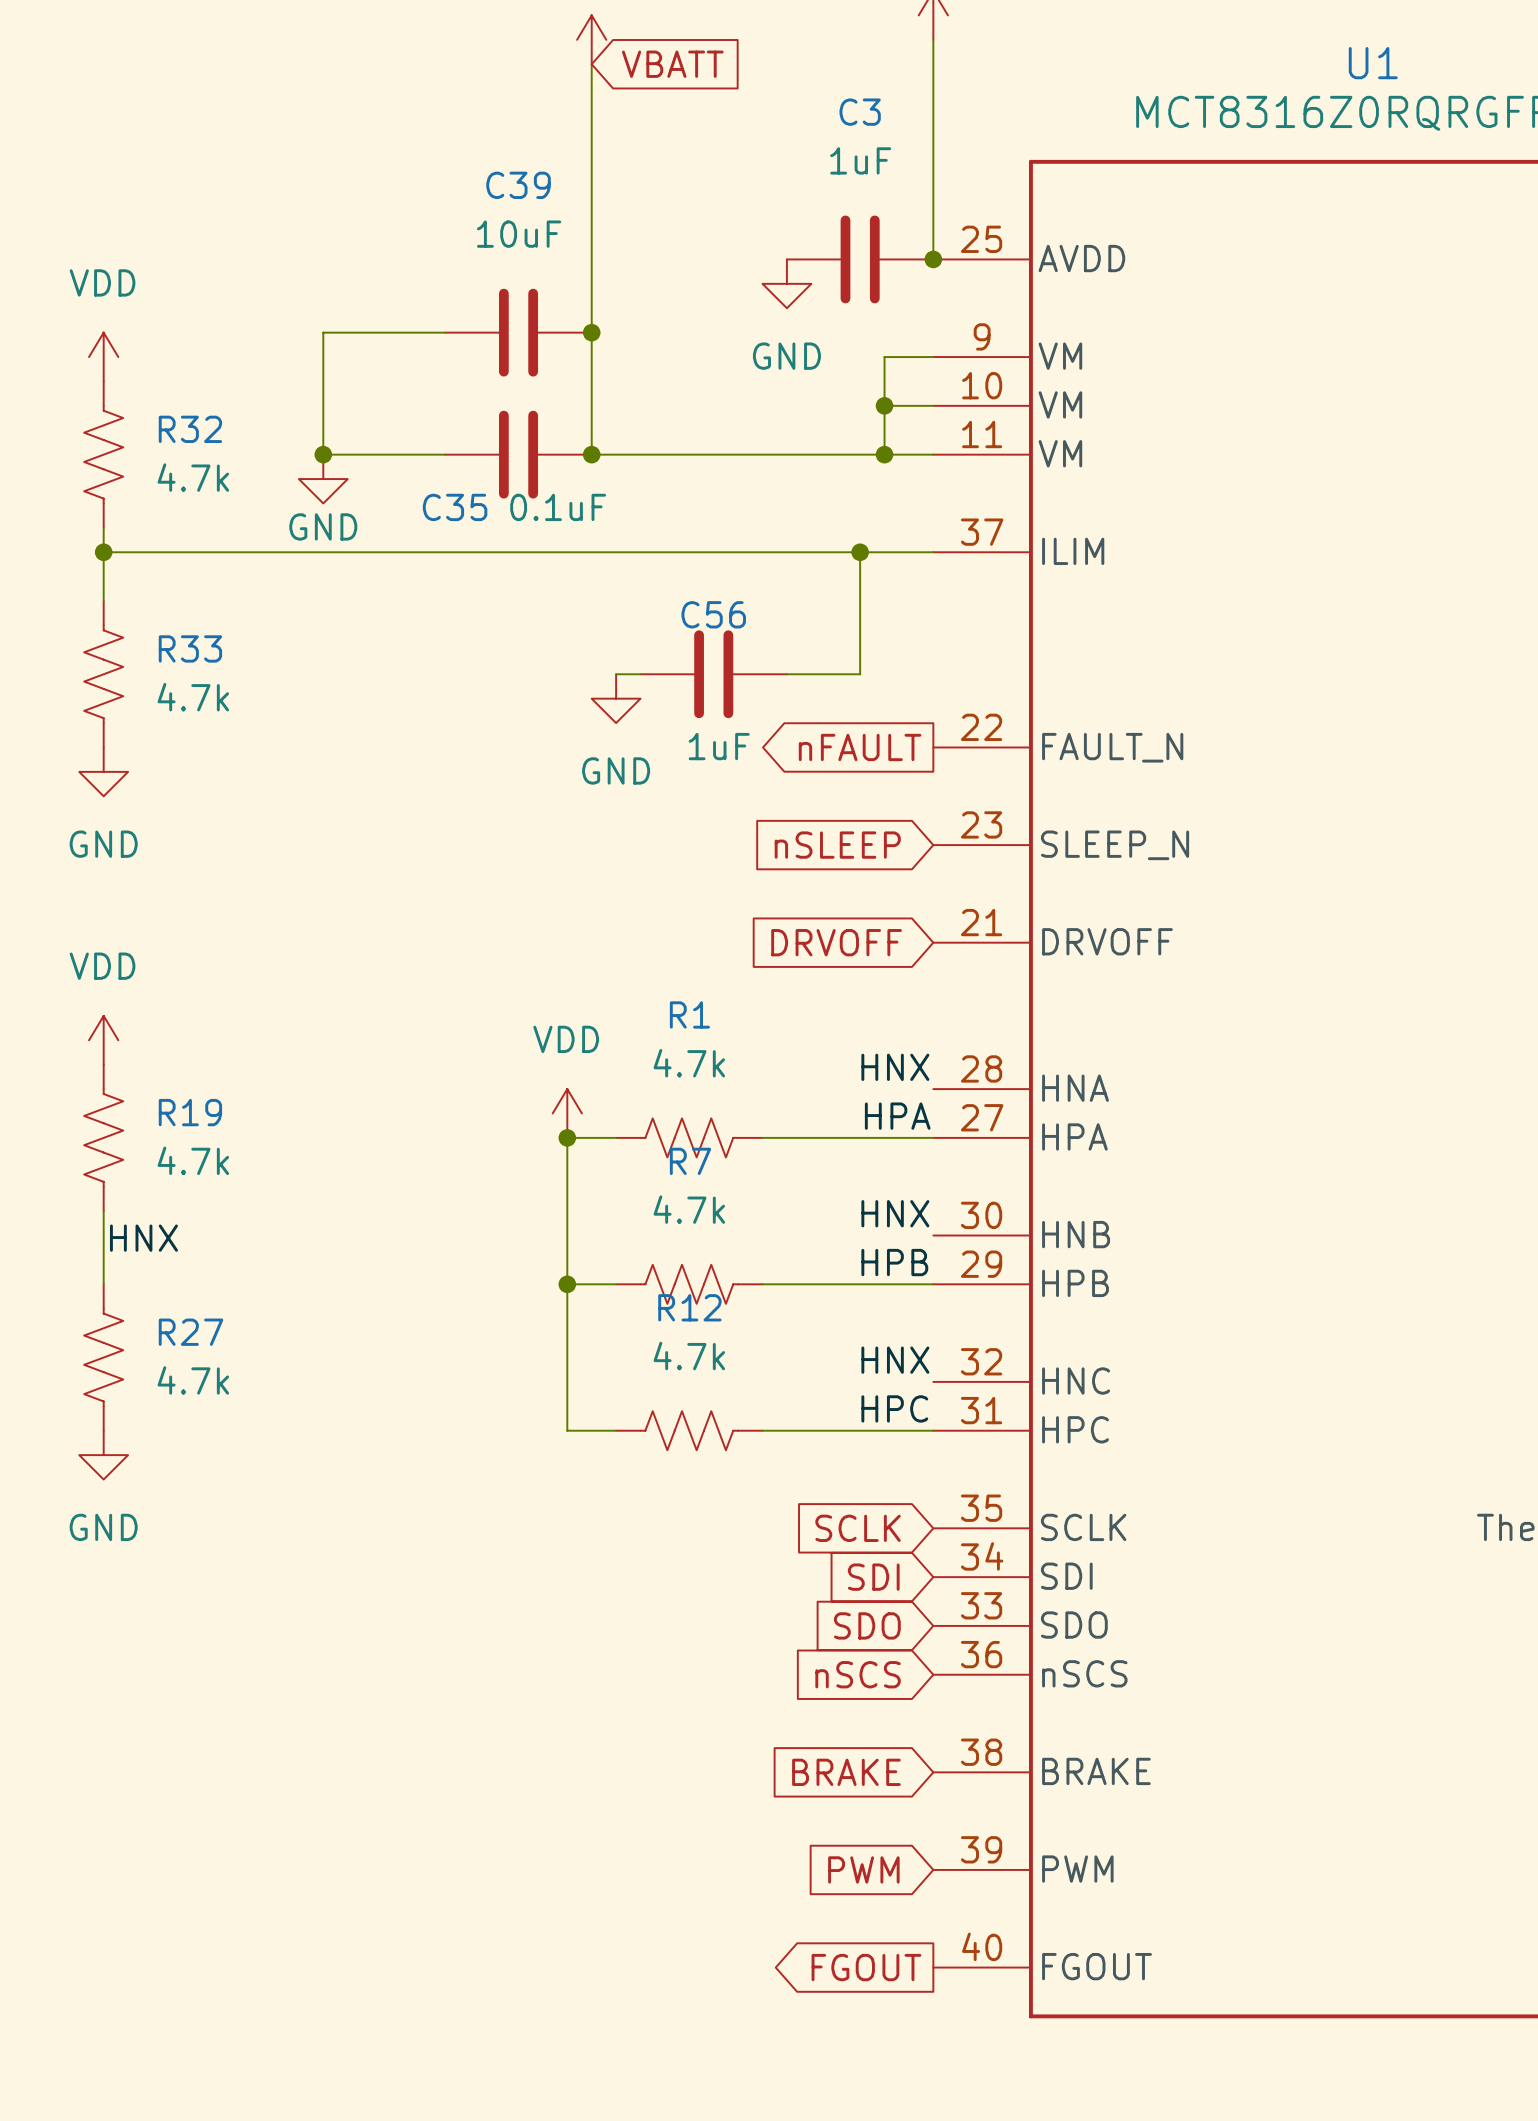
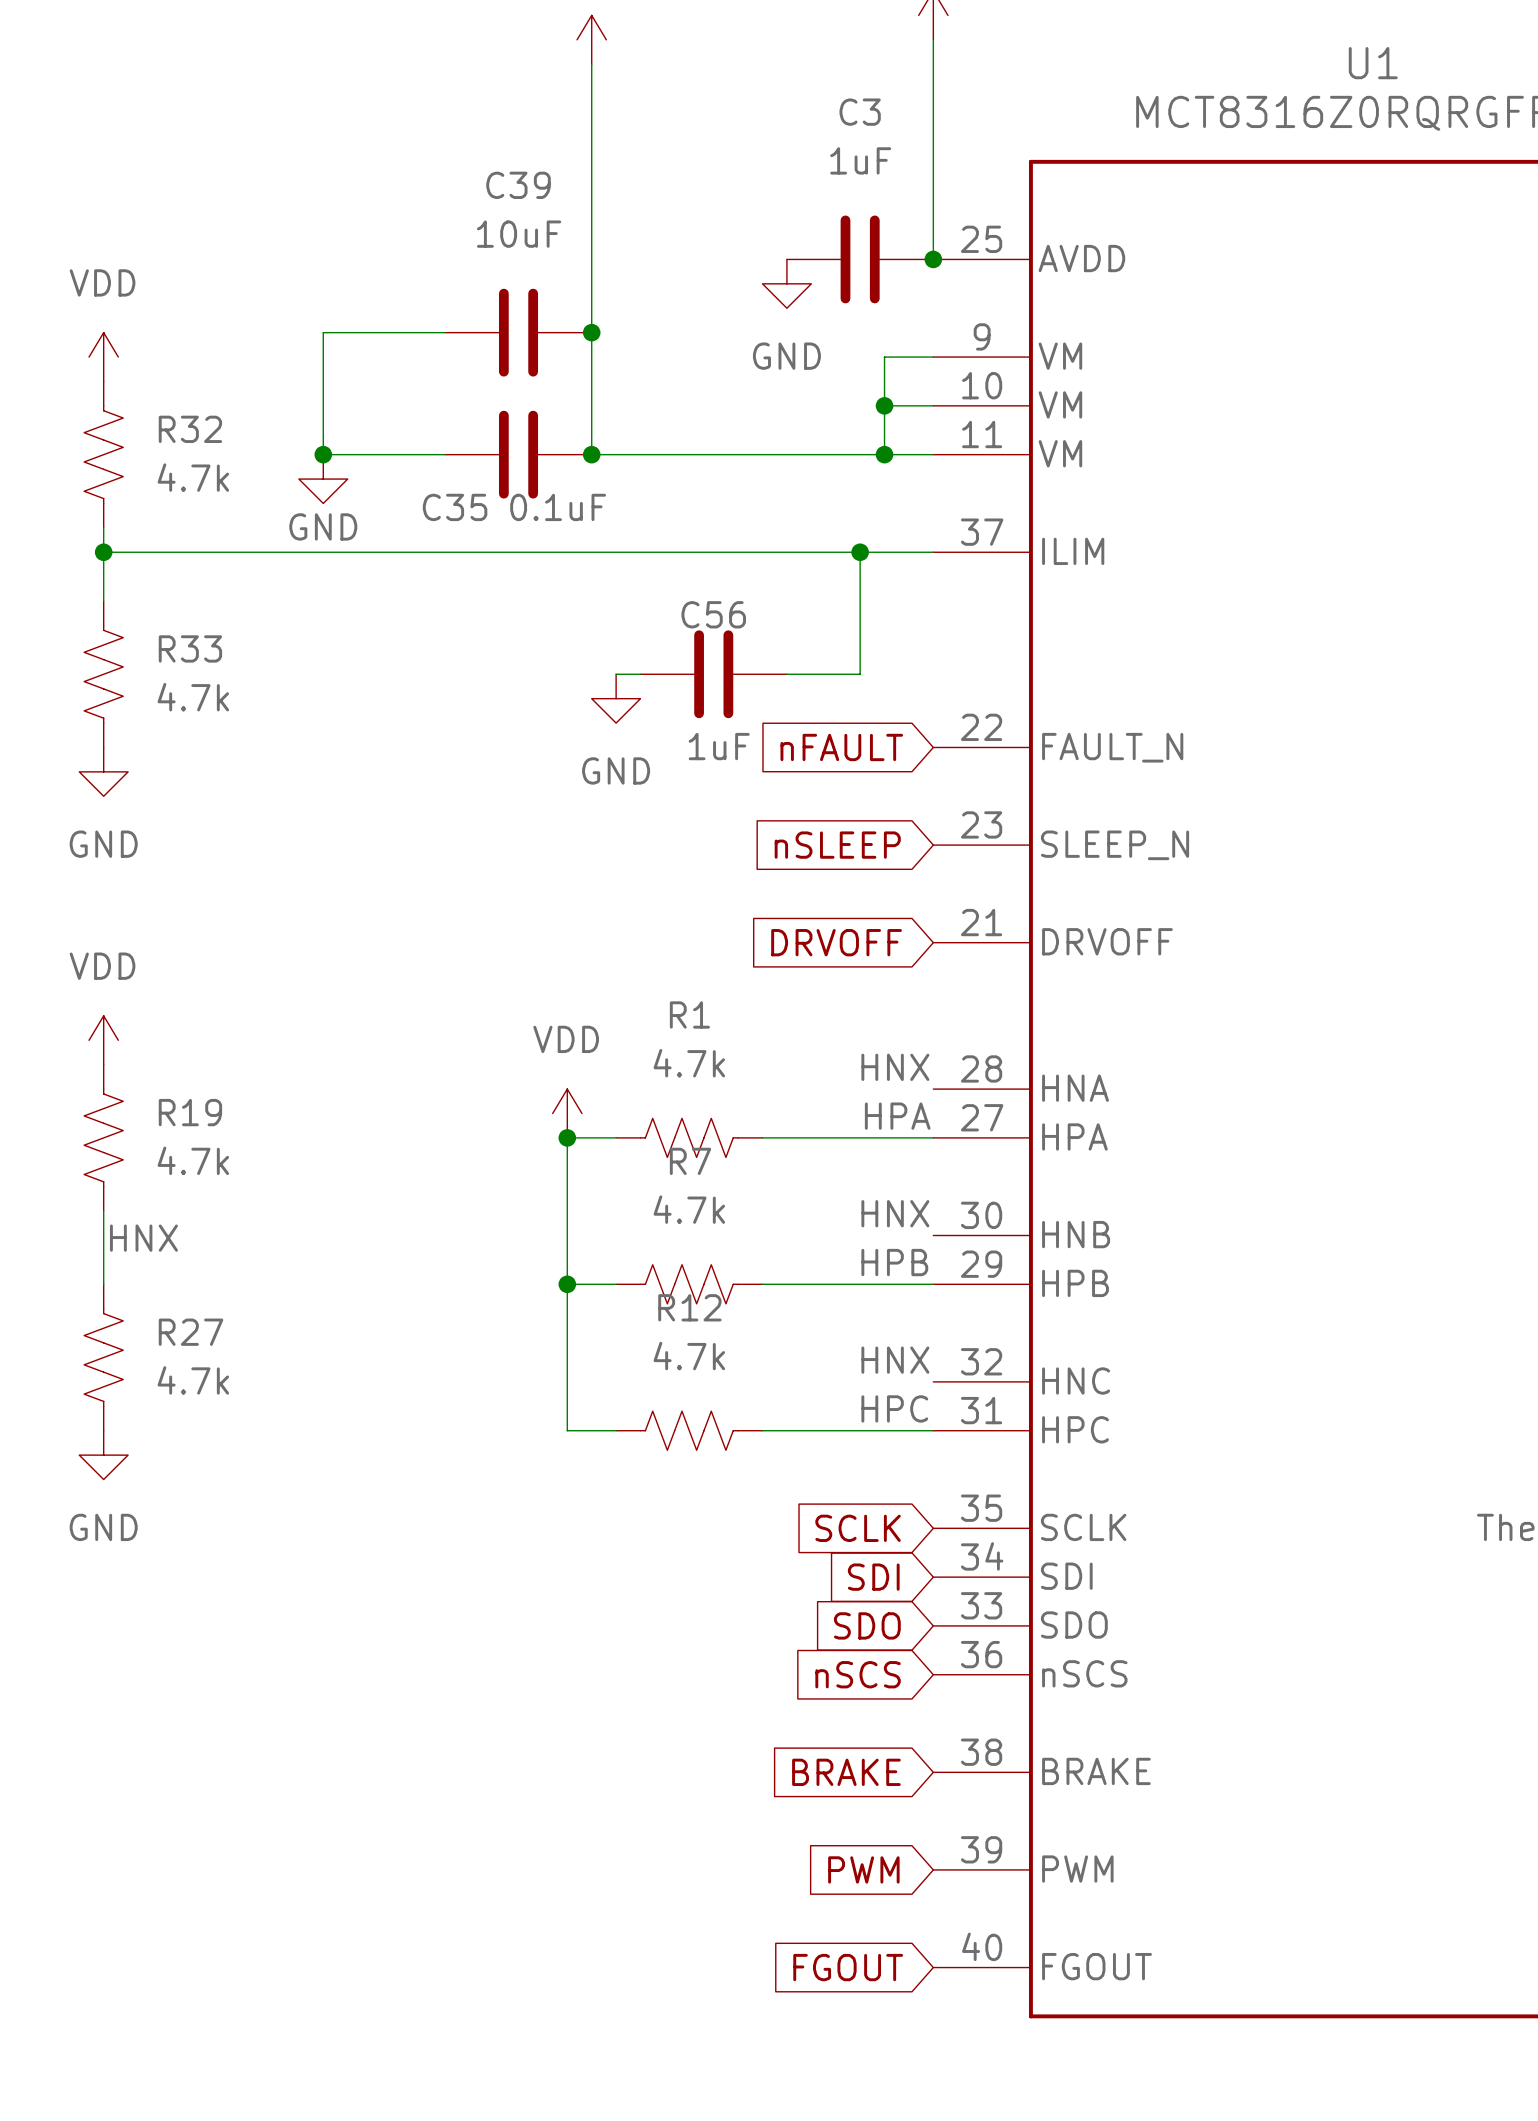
global label: VBATT (672, 64) -> none
global label shape: output (860, 747) -> input (841, 747)
global label shape: output (866, 1967) -> input (848, 1967)

